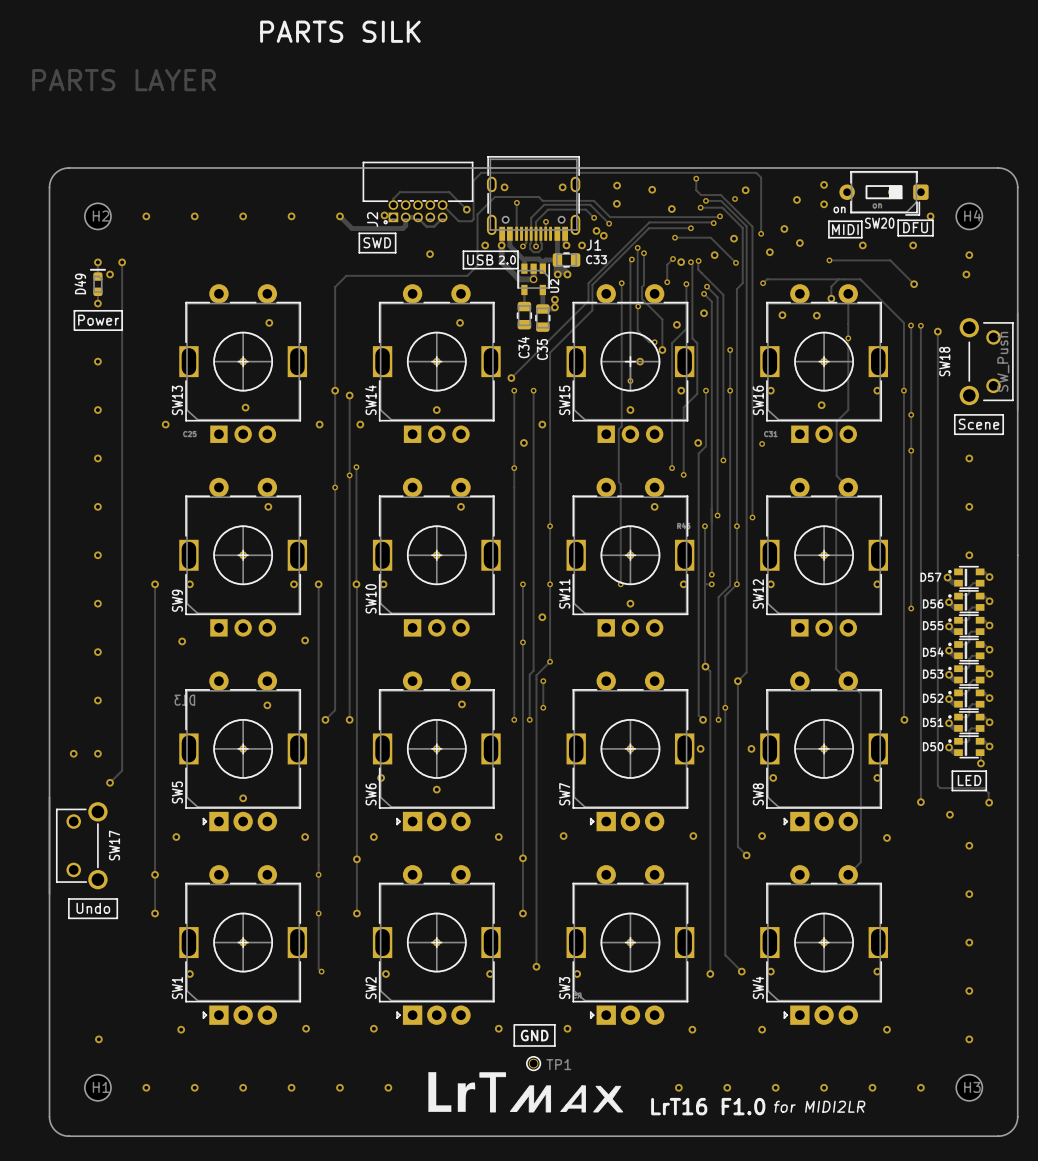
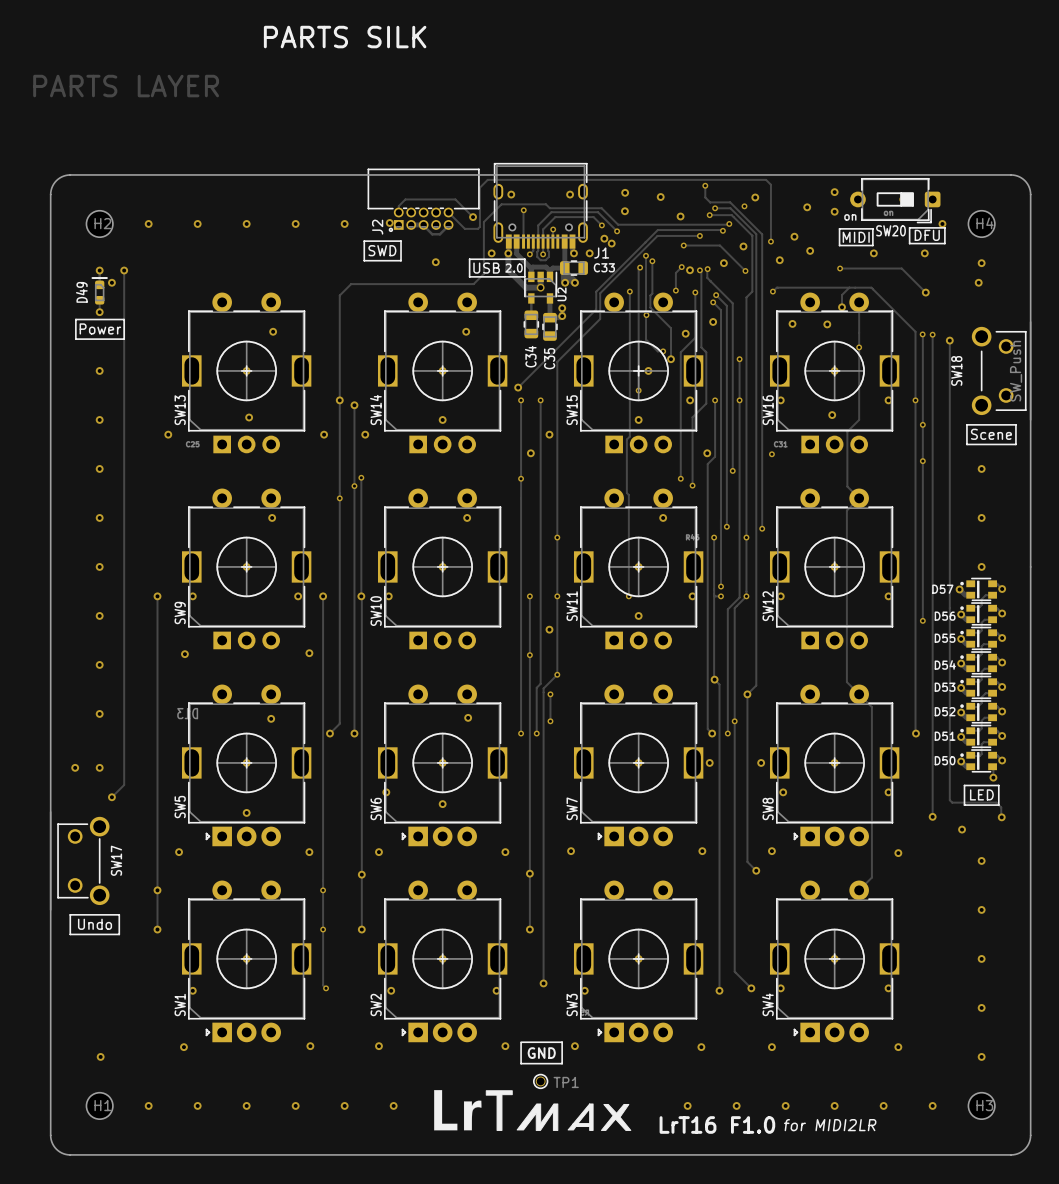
track: (339, 216) (352, 228) (402, 228) (405, 225) (405, 217) -> none

